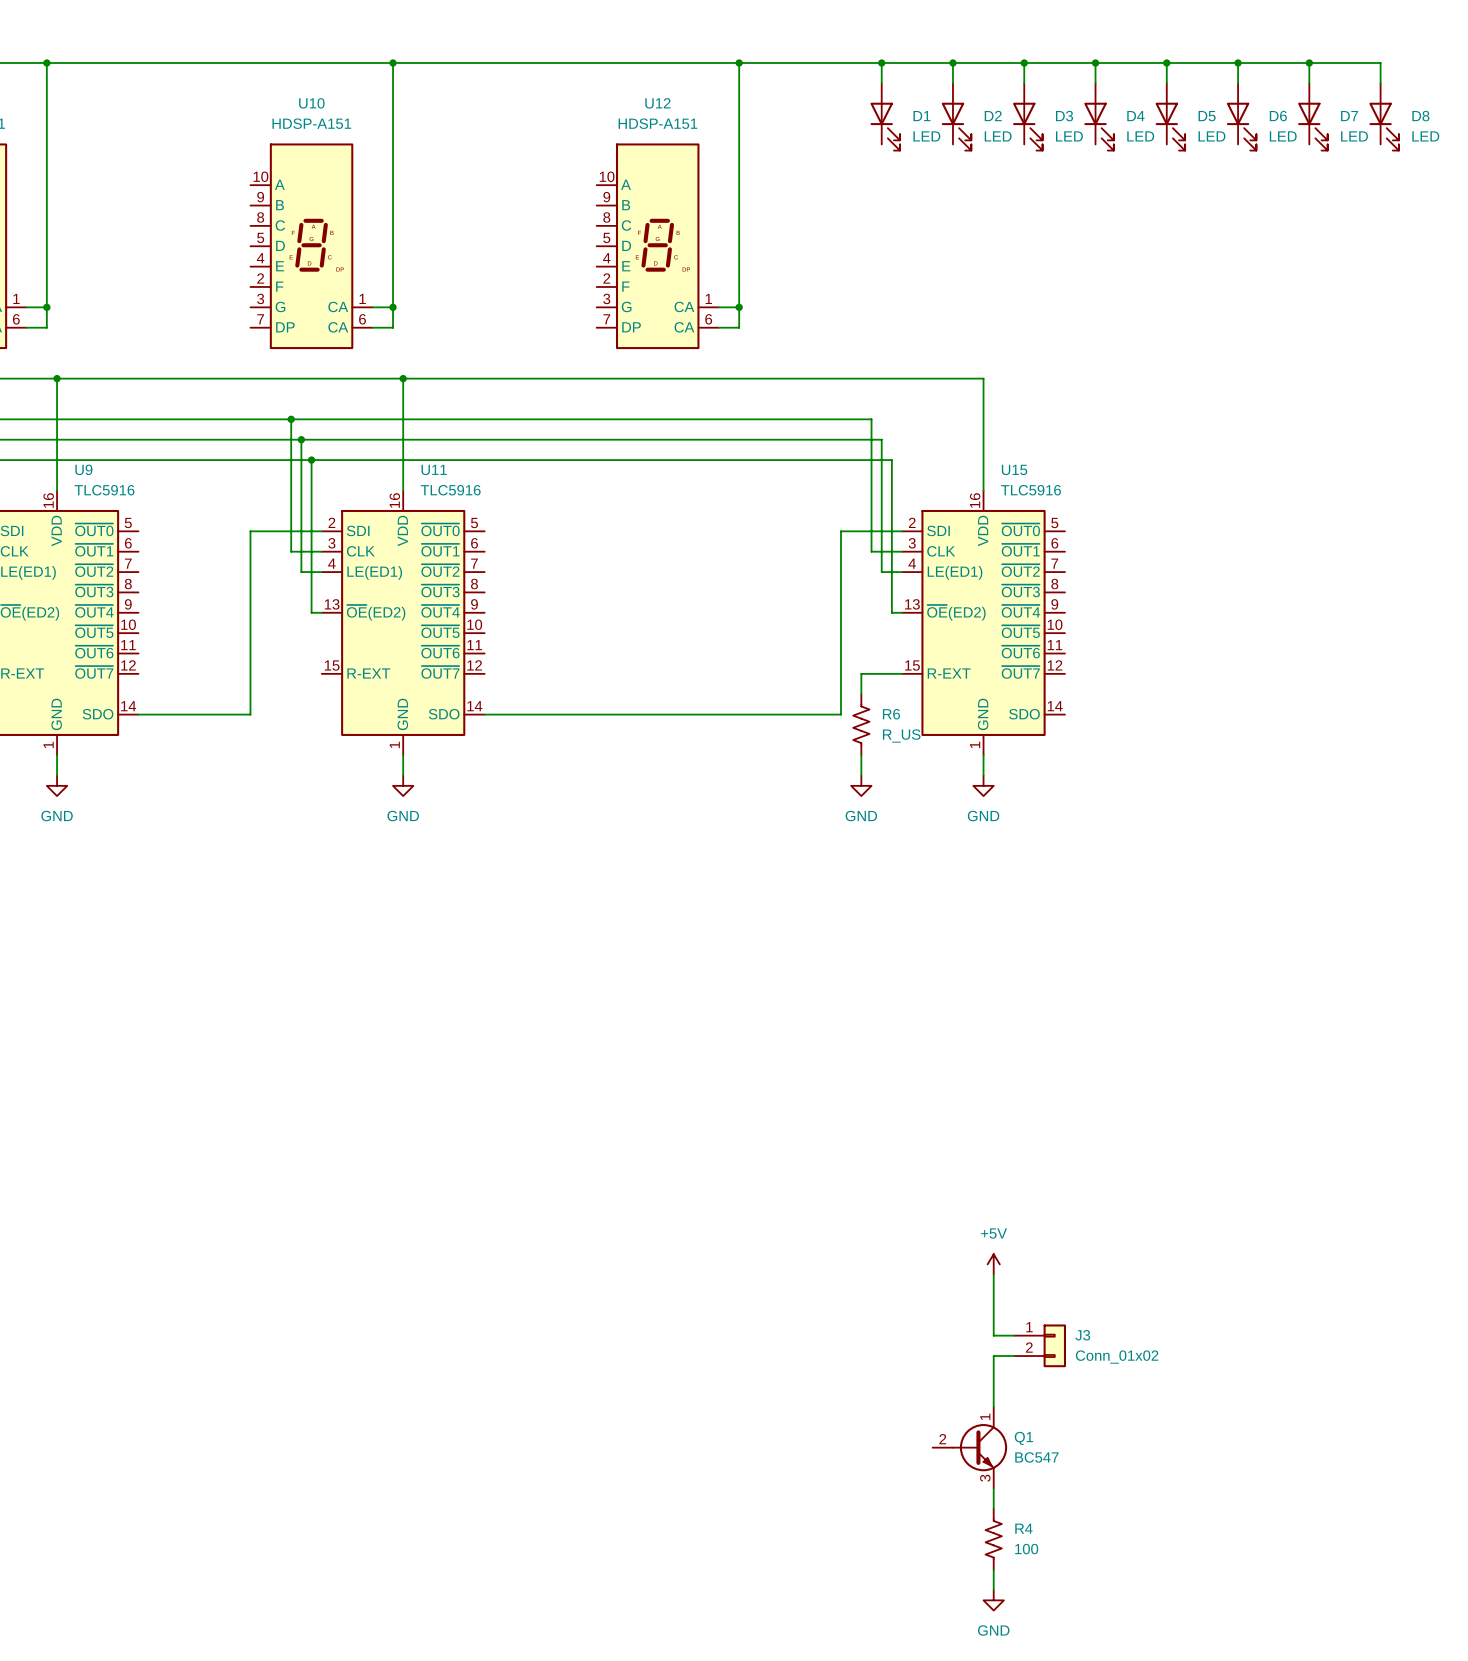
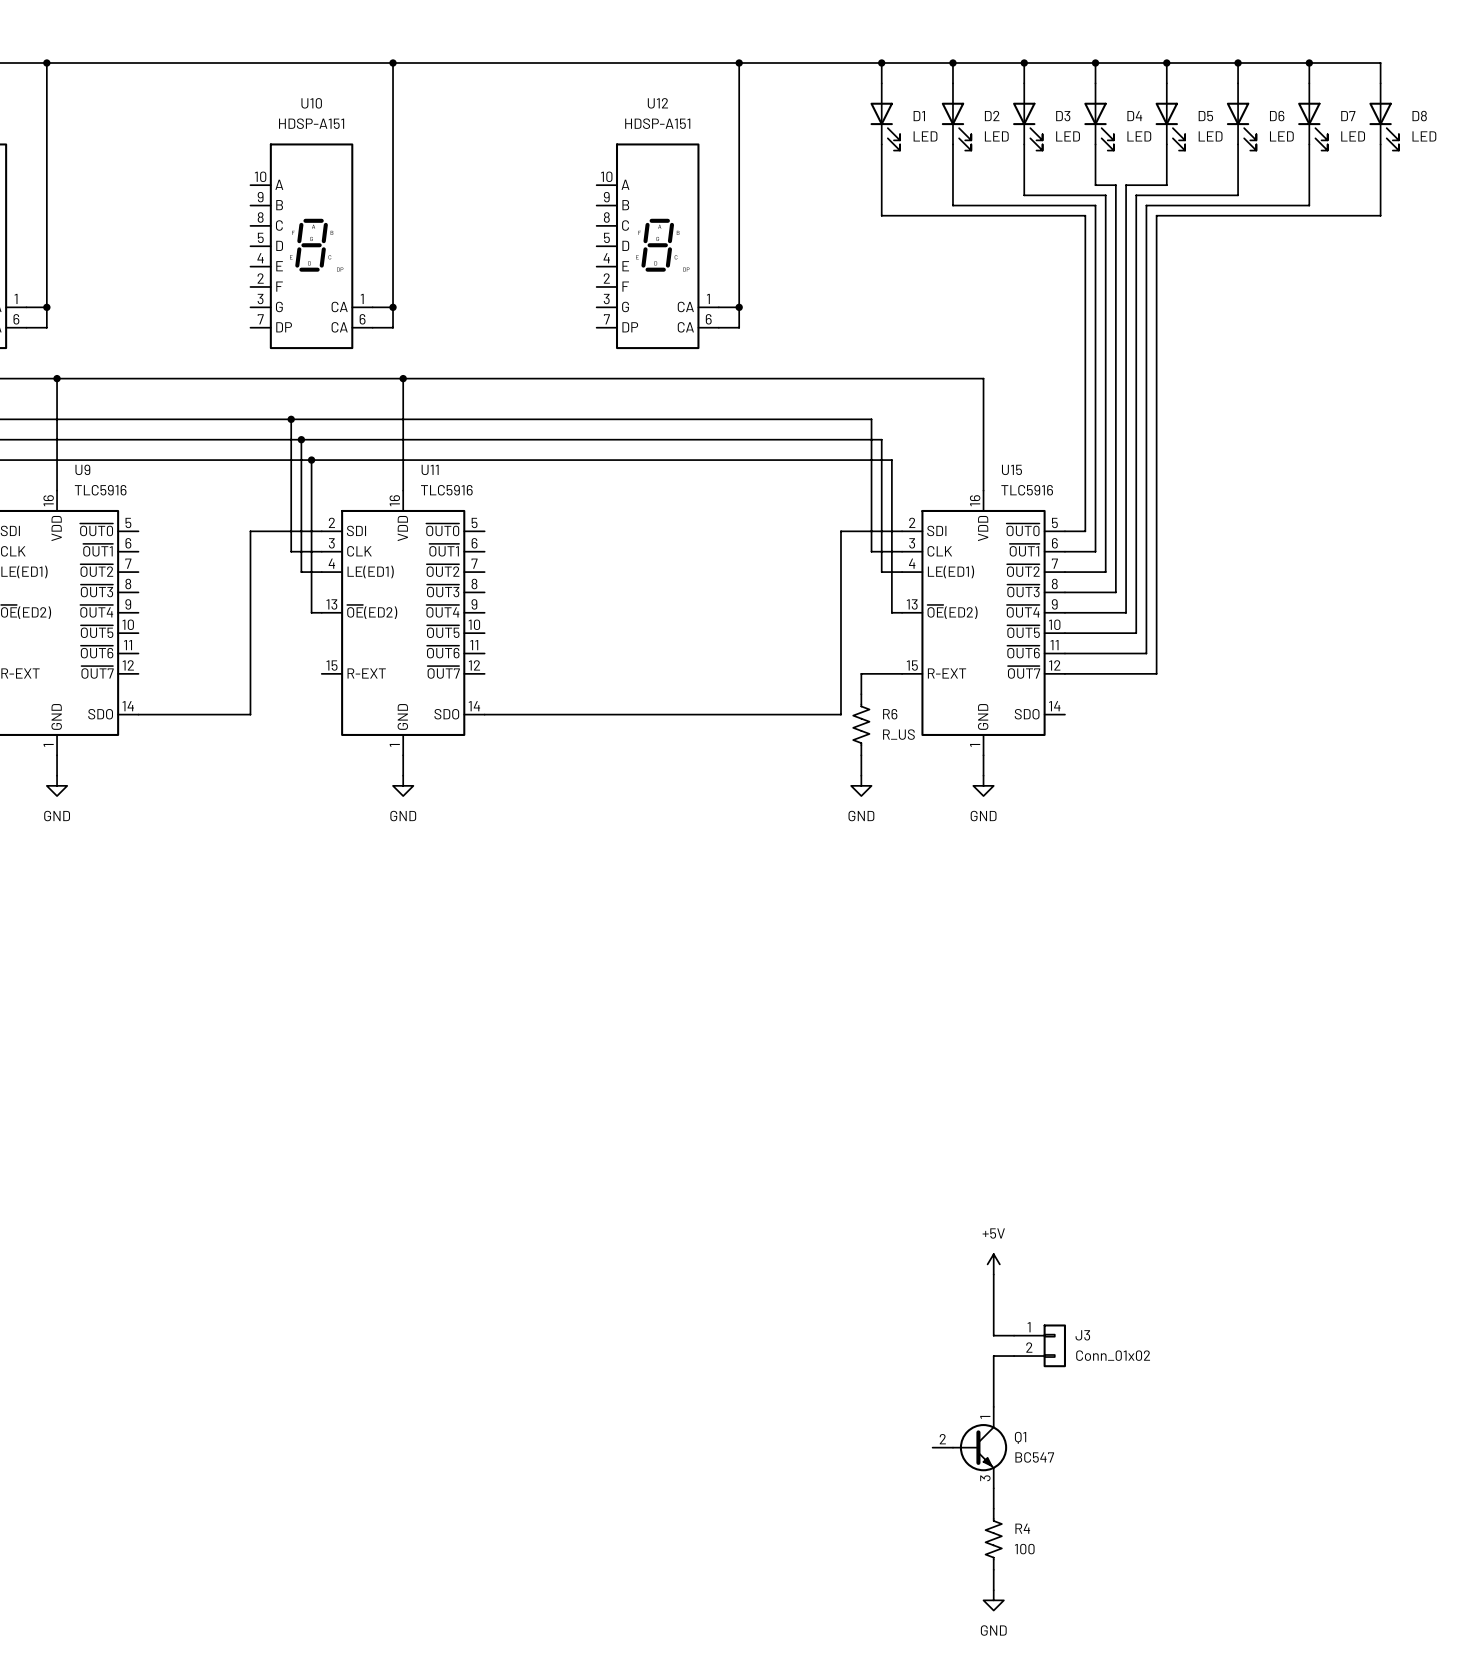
wire: none -> (881, 144) (881, 215) (1085, 215) (1085, 531) (1064, 531)
wire: none -> (952, 144) (952, 205) (1095, 205) (1095, 551) (1064, 551)
wire: none -> (1024, 144) (1024, 195) (1105, 195) (1105, 572) (1064, 572)
wire: none -> (1095, 144) (1095, 185) (1115, 185) (1115, 592) (1064, 592)
wire: none -> (1166, 144) (1166, 185) (1126, 185) (1126, 612) (1064, 612)
wire: none -> (1238, 144) (1238, 195) (1136, 195) (1136, 633) (1064, 633)
wire: none -> (1309, 144) (1309, 205) (1146, 205) (1146, 653) (1064, 653)
wire: none -> (1380, 144) (1380, 215) (1156, 215) (1156, 673) (1064, 673)

